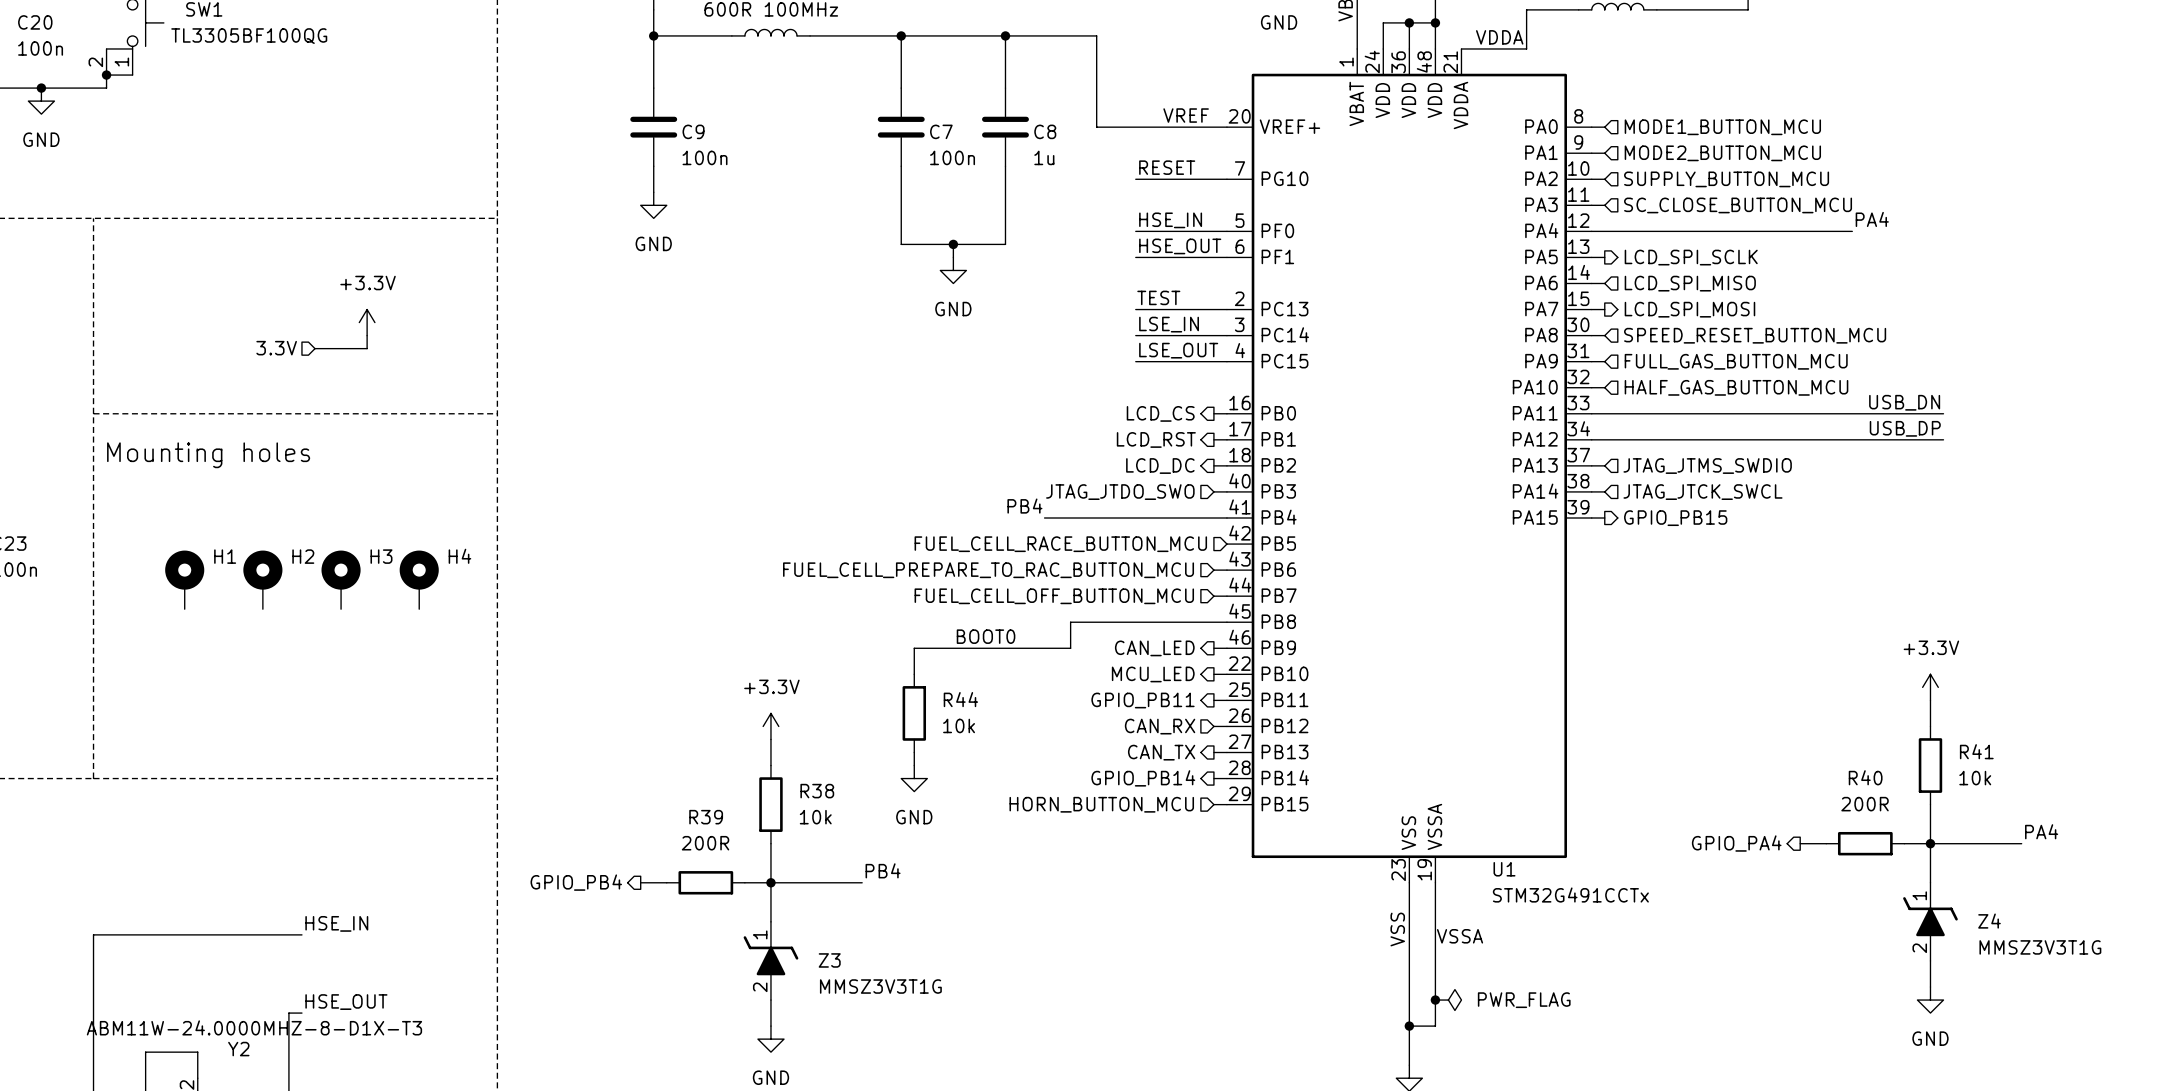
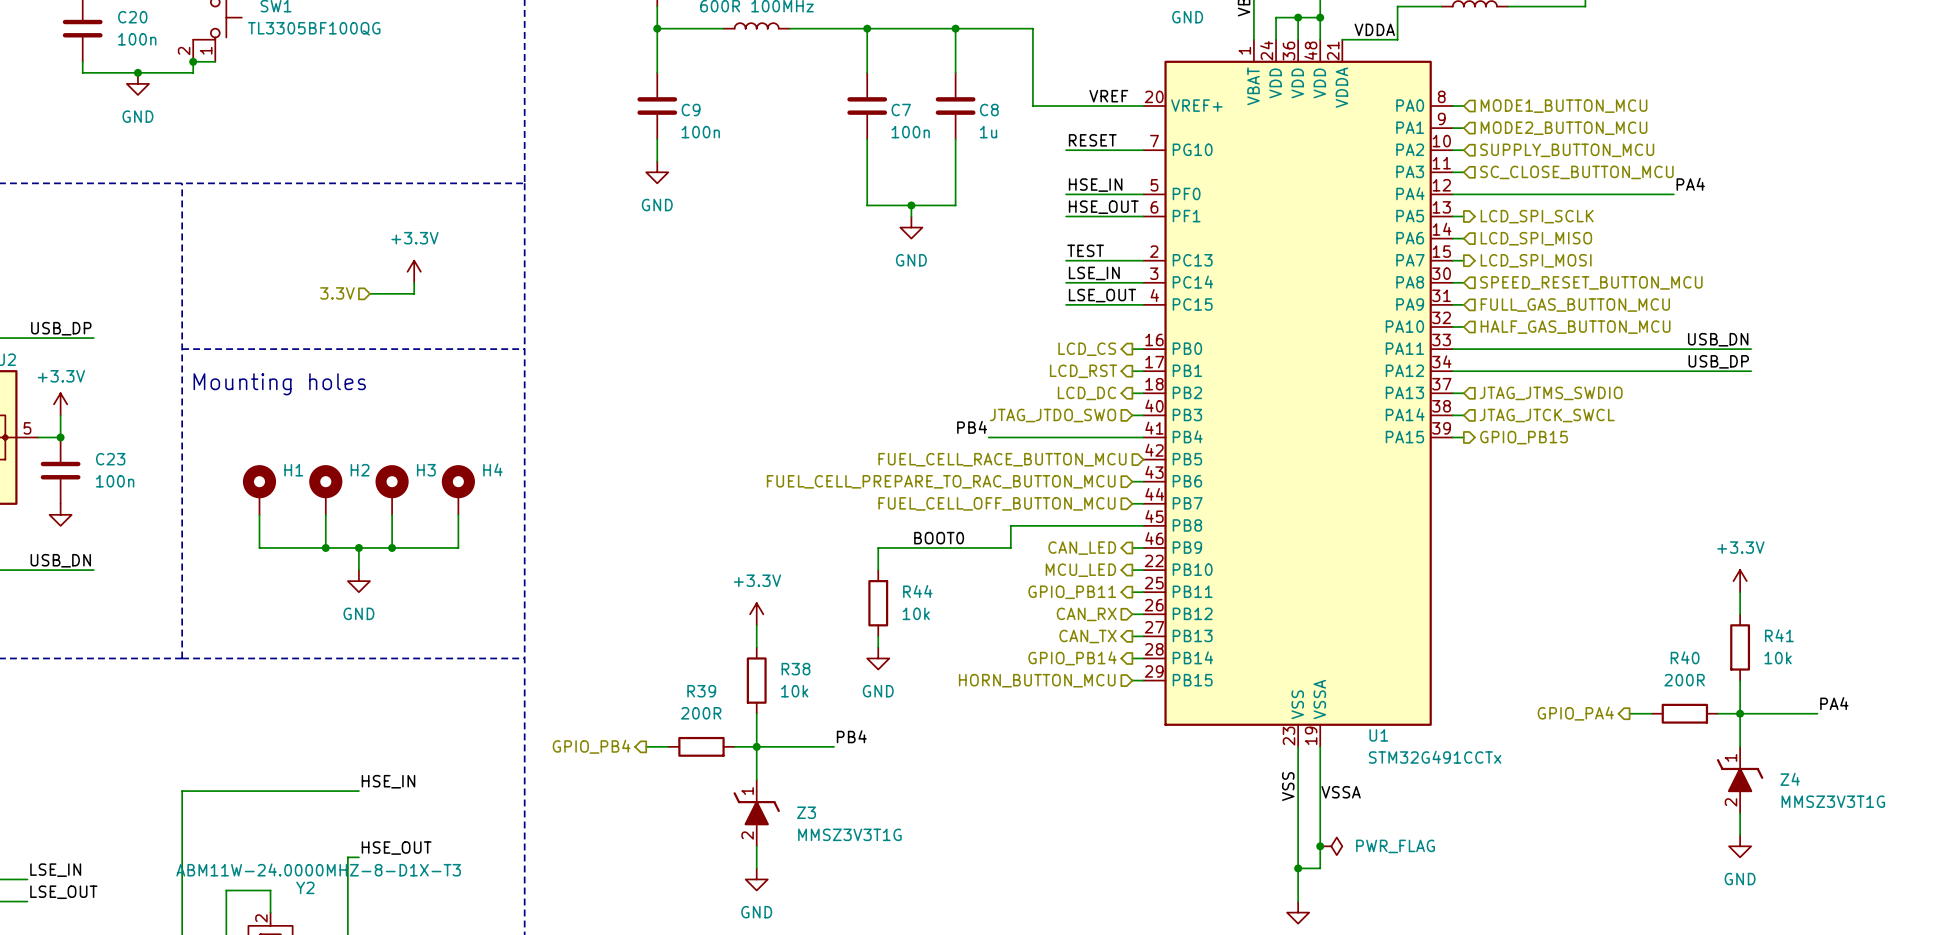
wire: none -> (259, 514) (259, 547) (458, 547) (458, 514)
wire: none -> (325, 514) (325, 547)
wire: none -> (392, 514) (392, 547)
junction: none -> (325, 547)
wire: none -> (358, 547) (358, 570)
junction: none -> (358, 547)
junction: none -> (392, 547)
power symbol: none -> GND (358, 581)

